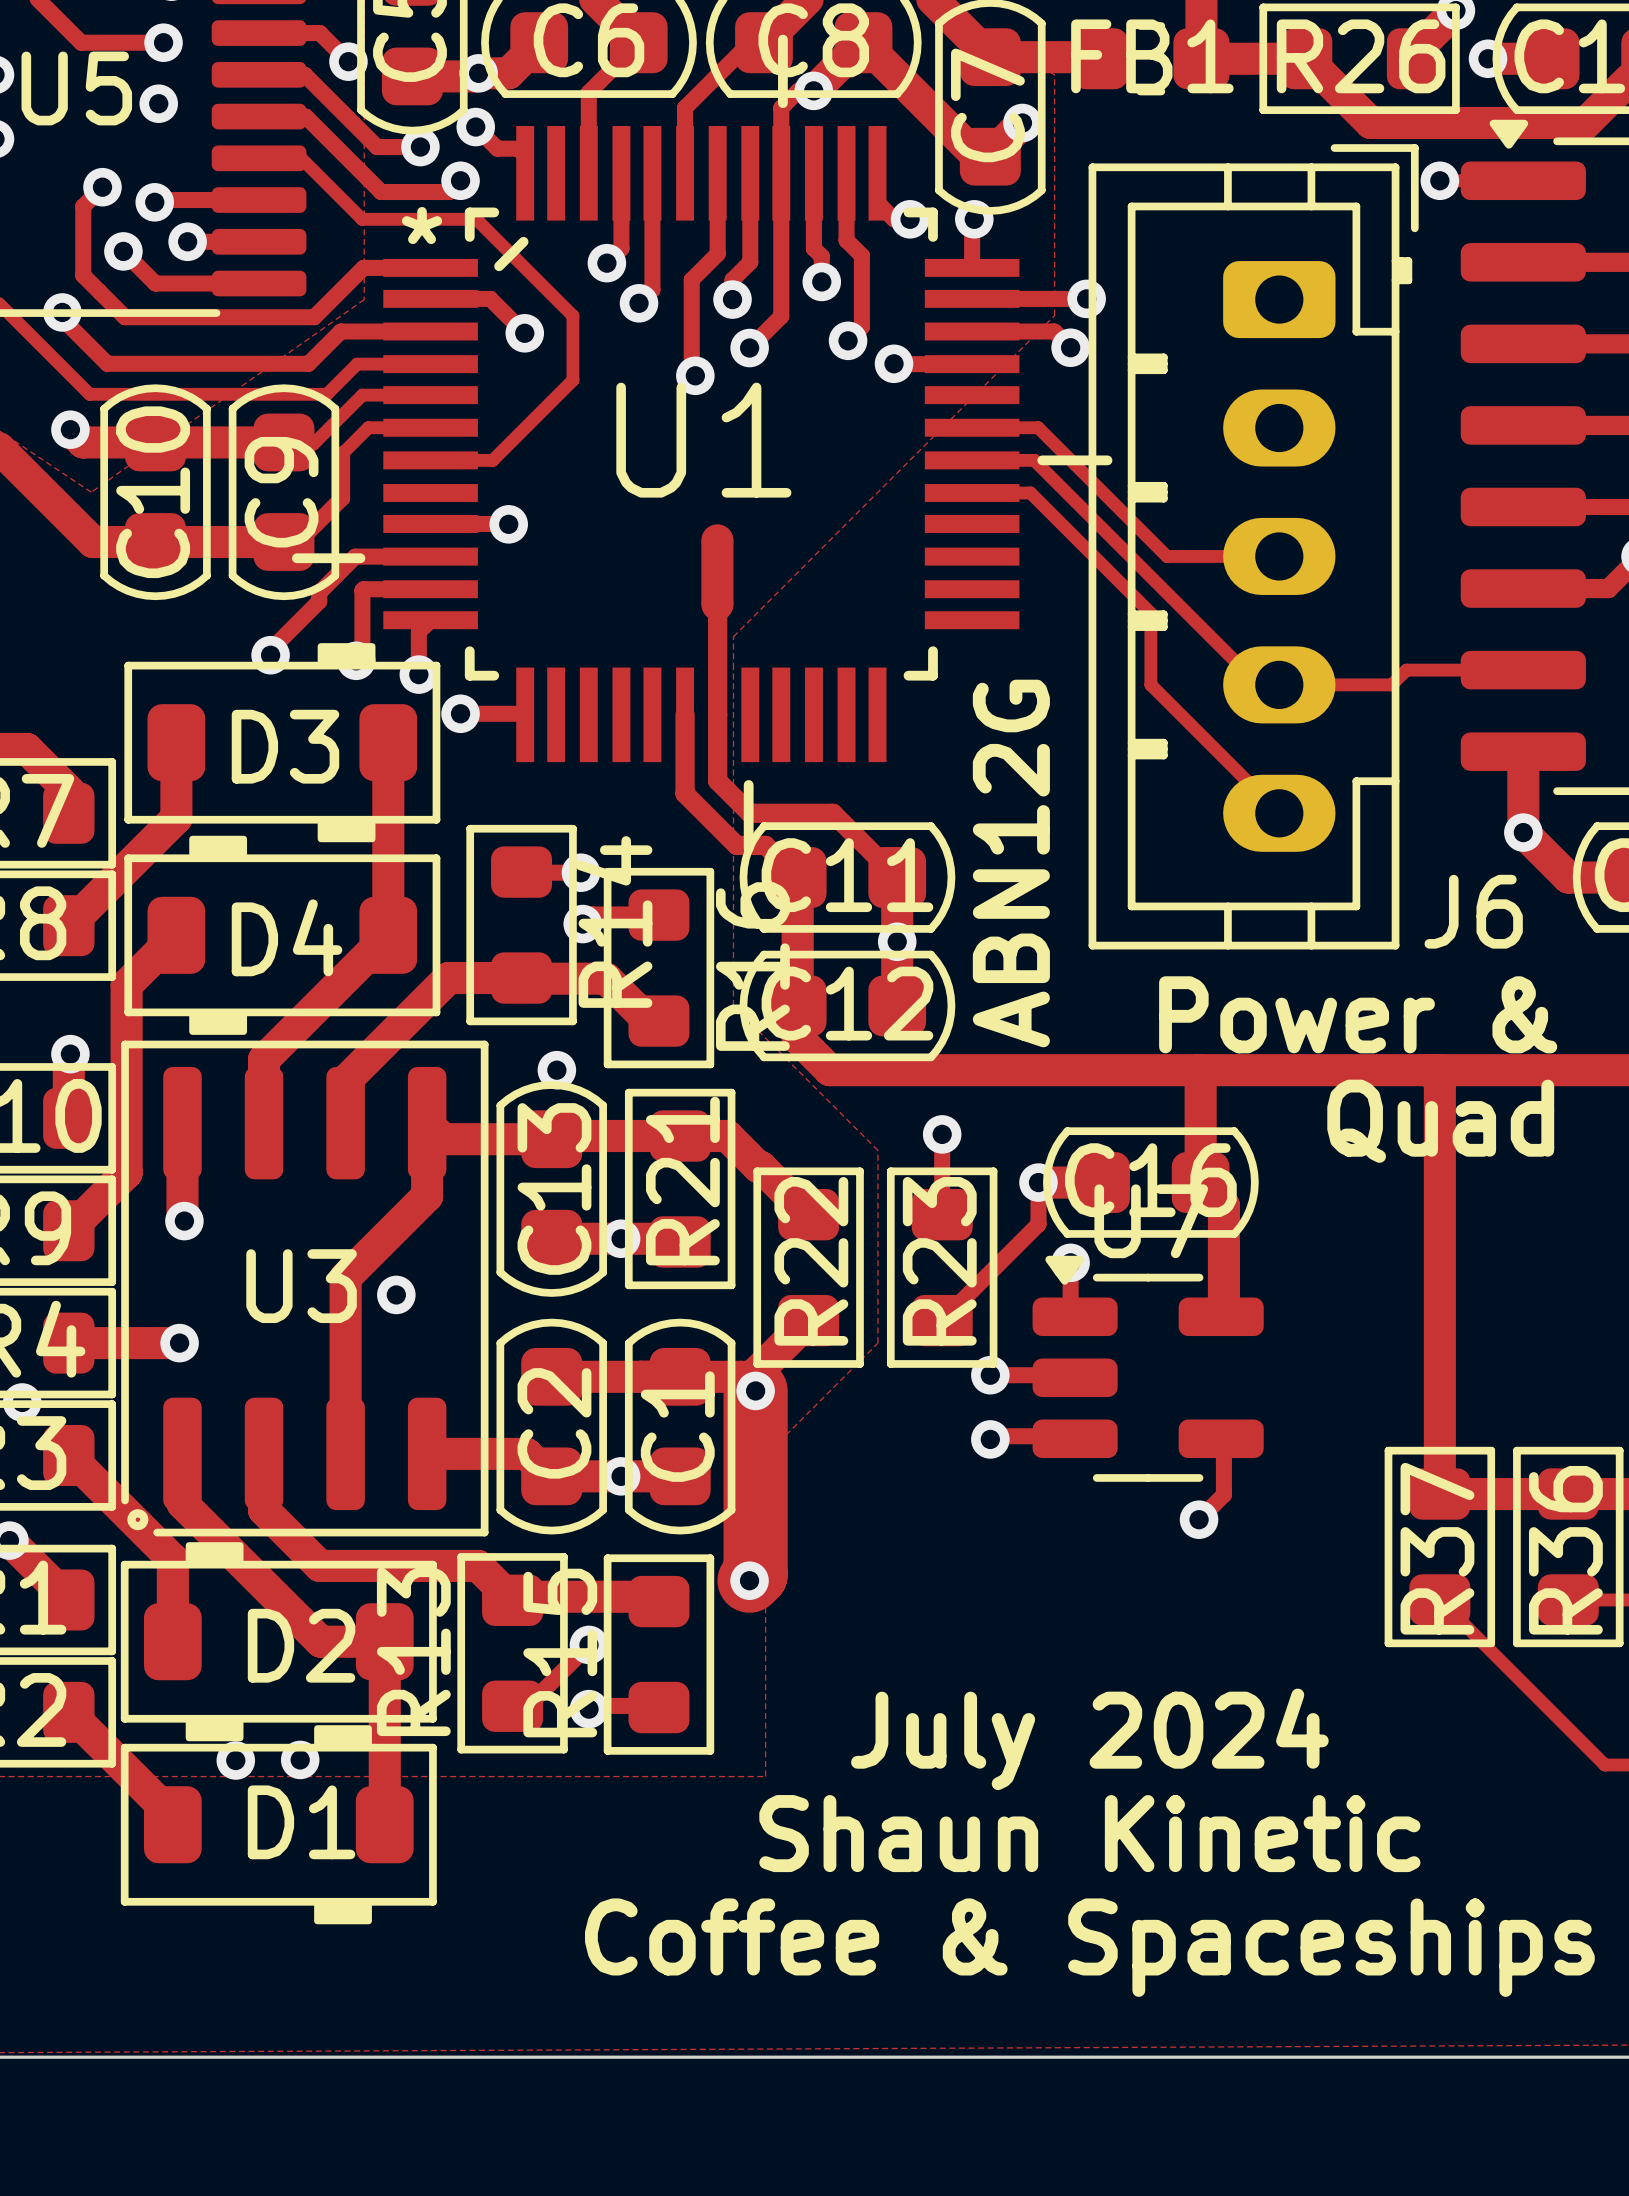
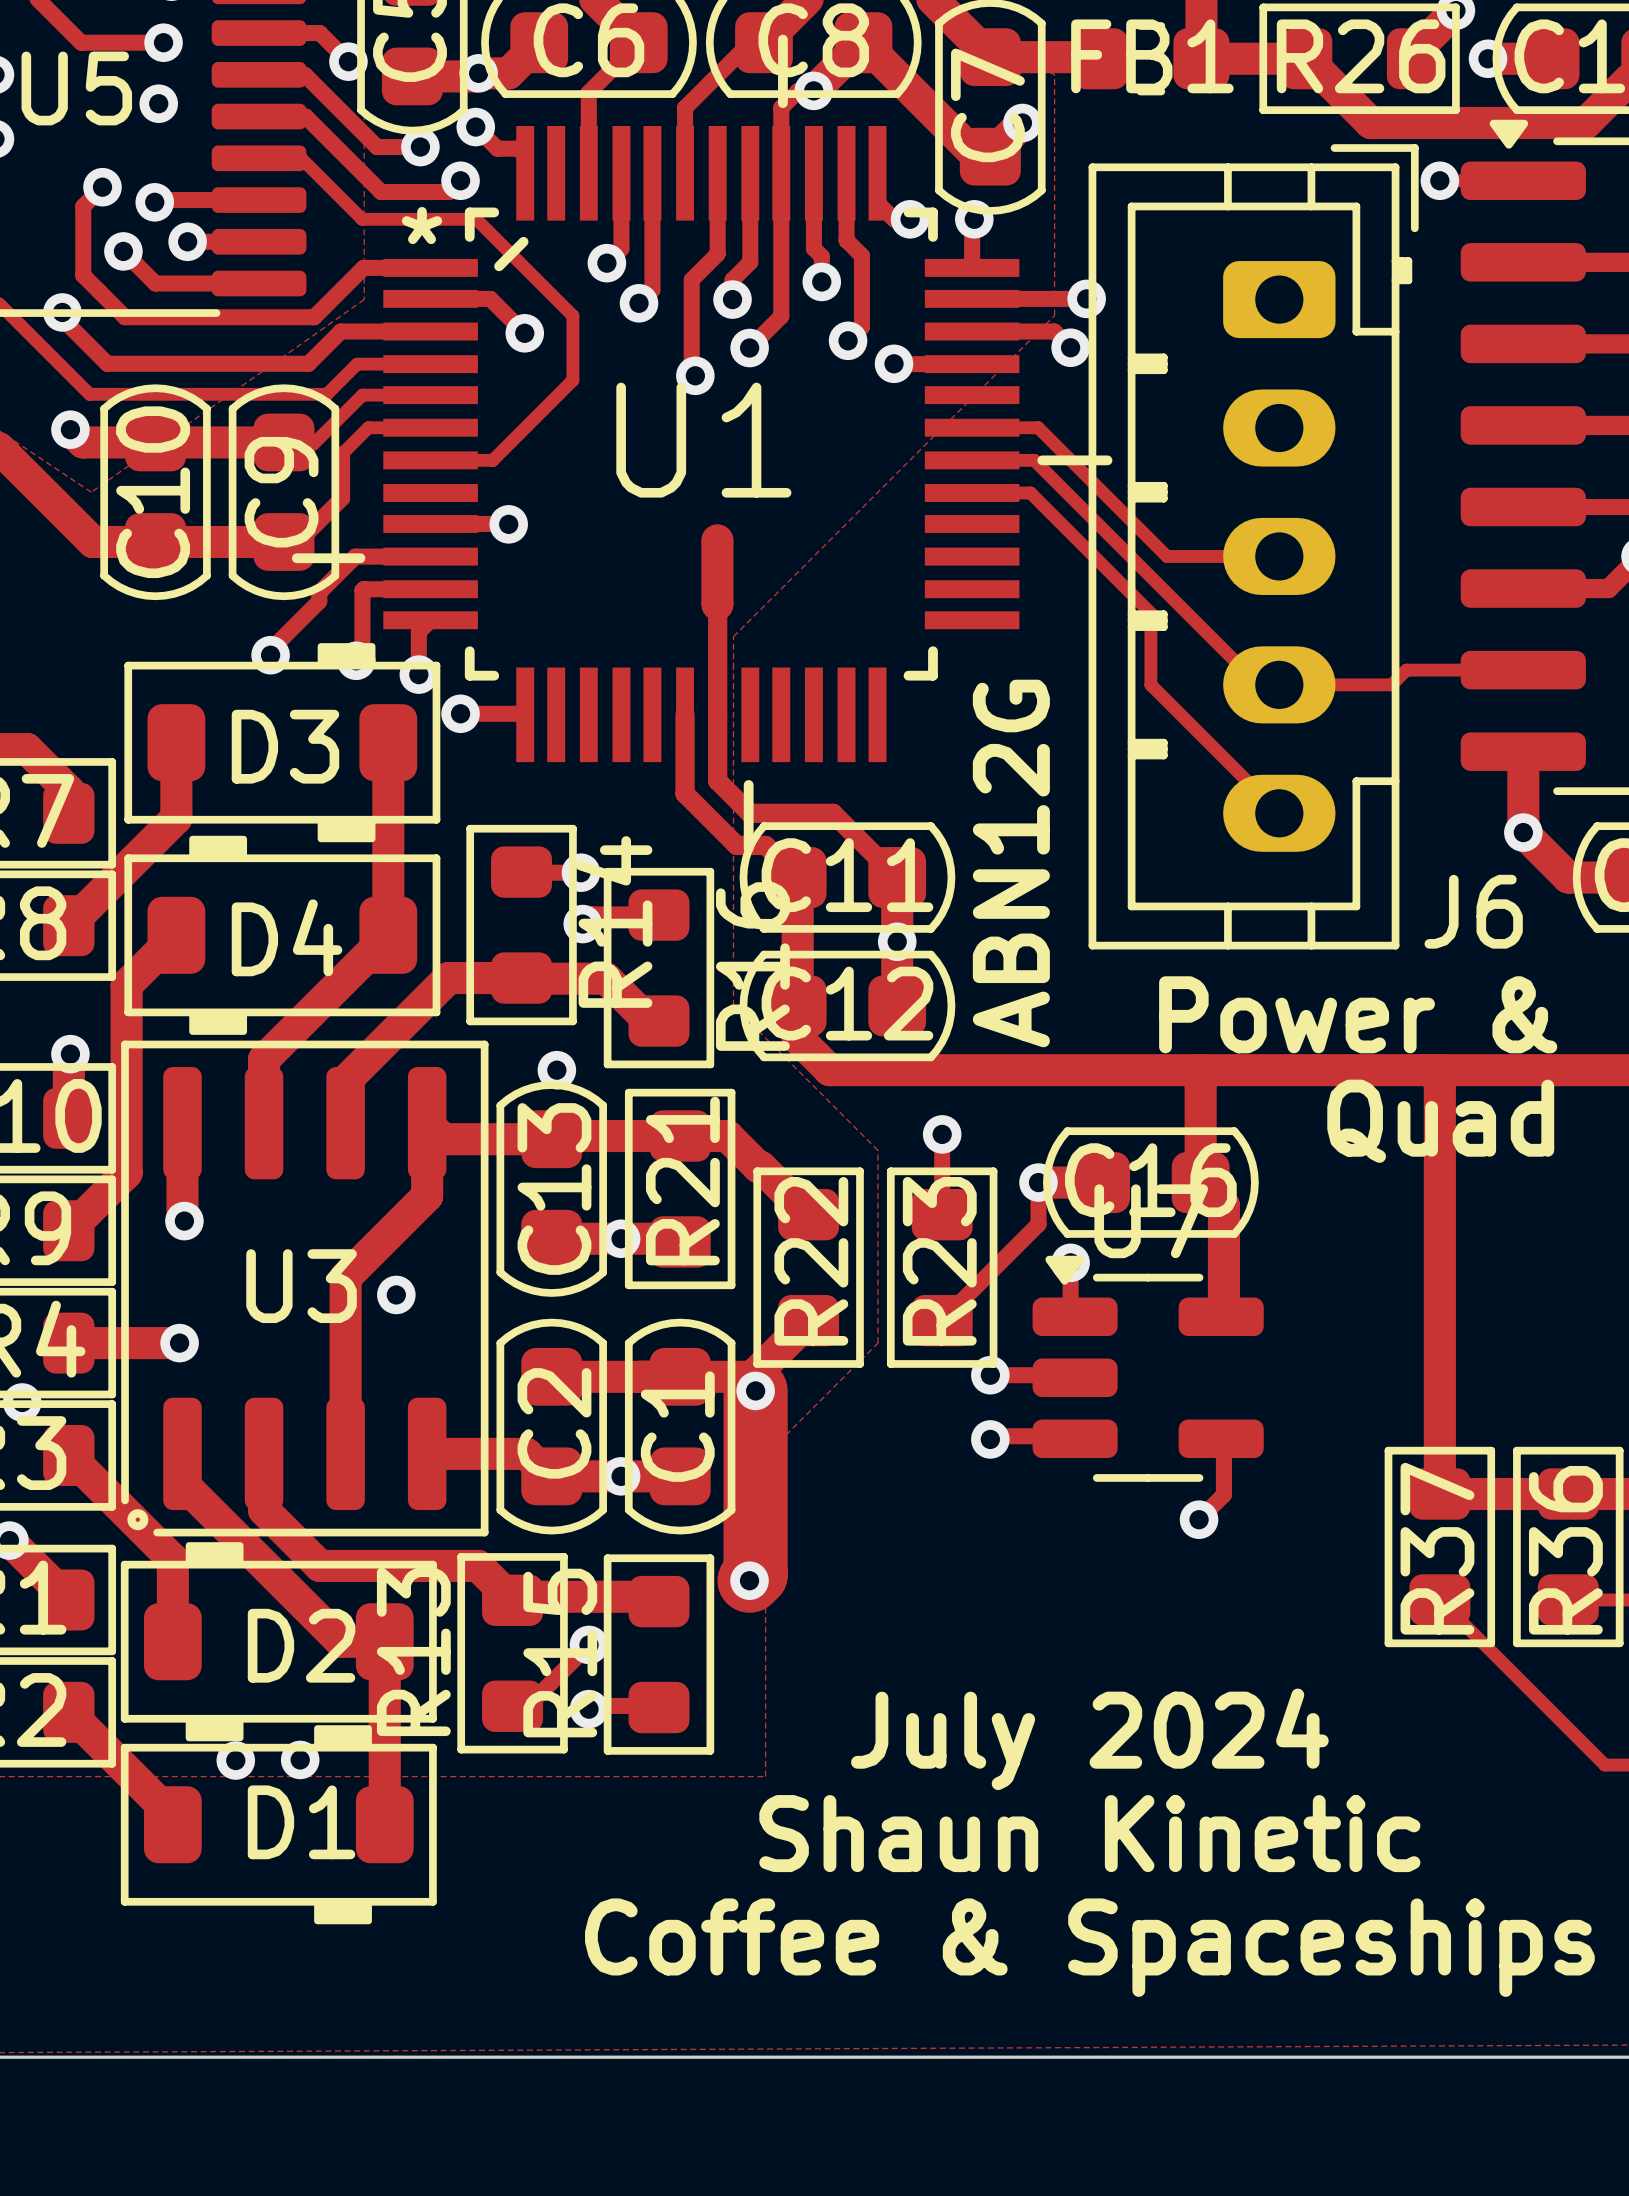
track: (182, 1483) (182, 1503) (320, 1641) (340, 1641) -> (182, 1483) (340, 1641)

